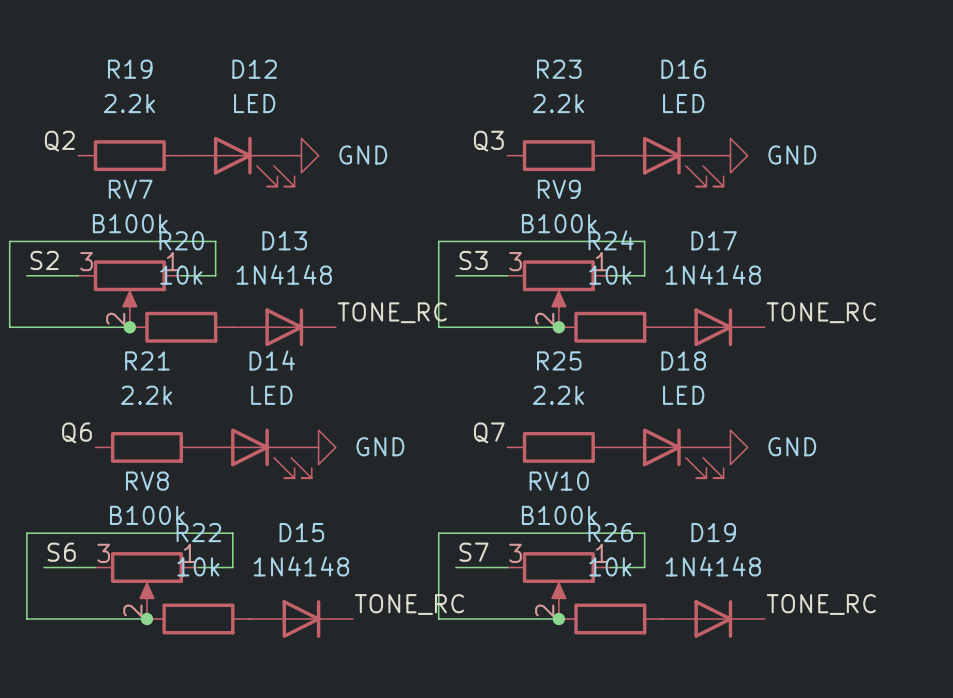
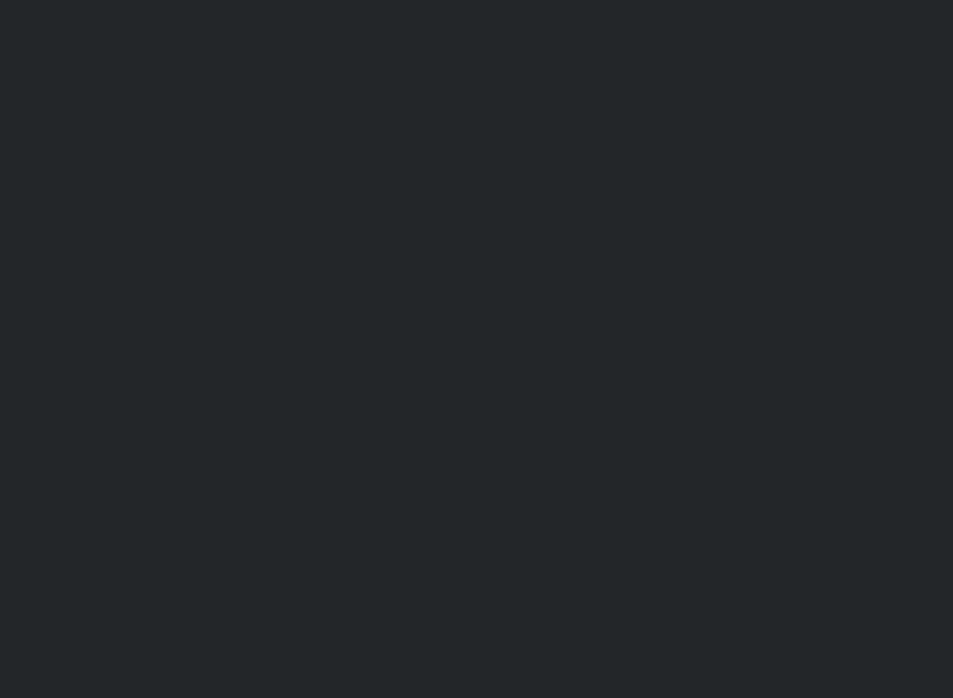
label: Q2 (59, 141) -> none
label: Q3 (488, 141) -> none
R19: 2.2k (129, 155) -> none
power symbol: GND (301, 155) -> none
R23: 2.2k (558, 155) -> none
power symbol: GND (730, 155) -> none
D12: LED (237, 161) -> none
D16: LED (666, 161) -> none
label: S2 (44, 260) -> none
label: S3 (473, 260) -> none
wire: (26, 275) (78, 275) -> none
wire: (181, 275) (215, 275) (215, 241) (9, 241) (9, 327) (129, 327) -> none
wire: (455, 275) (507, 275) -> none
wire: (610, 275) (644, 275) (644, 241) (438, 241) (438, 327) (558, 327) -> none
RV7: B100k (129, 293) -> none
RV9: B100k (558, 293) -> none
label: TONE_RC (392, 312) -> none
label: TONE_RC (821, 312) -> none
junction: (129, 327) -> none
R20: 10k (181, 327) -> none
D13: 1N4148 (284, 327) -> none
junction: (558, 327) -> none
R24: 10k (610, 327) -> none
D17: 1N4148 (713, 327) -> none
label: Q6 (76, 432) -> none
label: Q7 (489, 432) -> none
R21: 2.2k (146, 447) -> none
power symbol: GND (318, 447) -> none
R25: 2.2k (558, 447) -> none
power symbol: GND (730, 447) -> none
D14: LED (255, 453) -> none
D18: LED (666, 453) -> none
label: S6 (61, 552) -> none
label: S7 (473, 552) -> none
wire: (44, 567) (95, 567) -> none
wire: (198, 567) (232, 567) (232, 533) (26, 533) (26, 619) (146, 619) -> none
wire: (455, 567) (507, 567) -> none
wire: (610, 567) (644, 567) (644, 533) (438, 533) (438, 619) (558, 619) -> none
RV8: B100k (146, 585) -> none
RV10: B100k (558, 585) -> none
label: TONE_RC (409, 604) -> none
label: TONE_RC (821, 604) -> none
junction: (146, 619) -> none
R22: 10k (198, 619) -> none
D15: 1N4148 (301, 619) -> none
junction: (558, 619) -> none
R26: 10k (610, 619) -> none
D19: 1N4148 (713, 619) -> none

